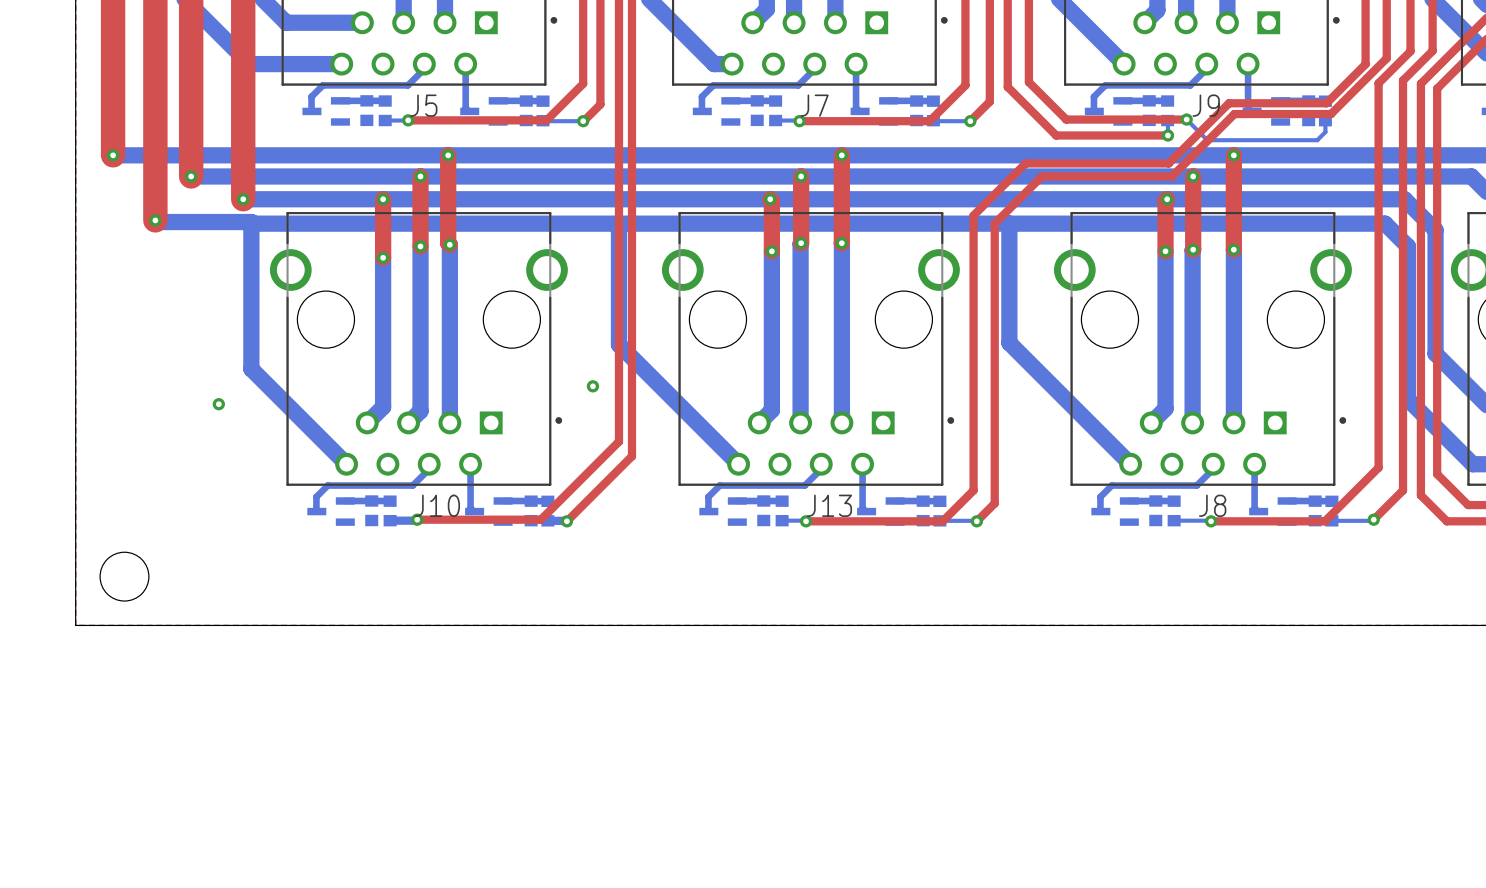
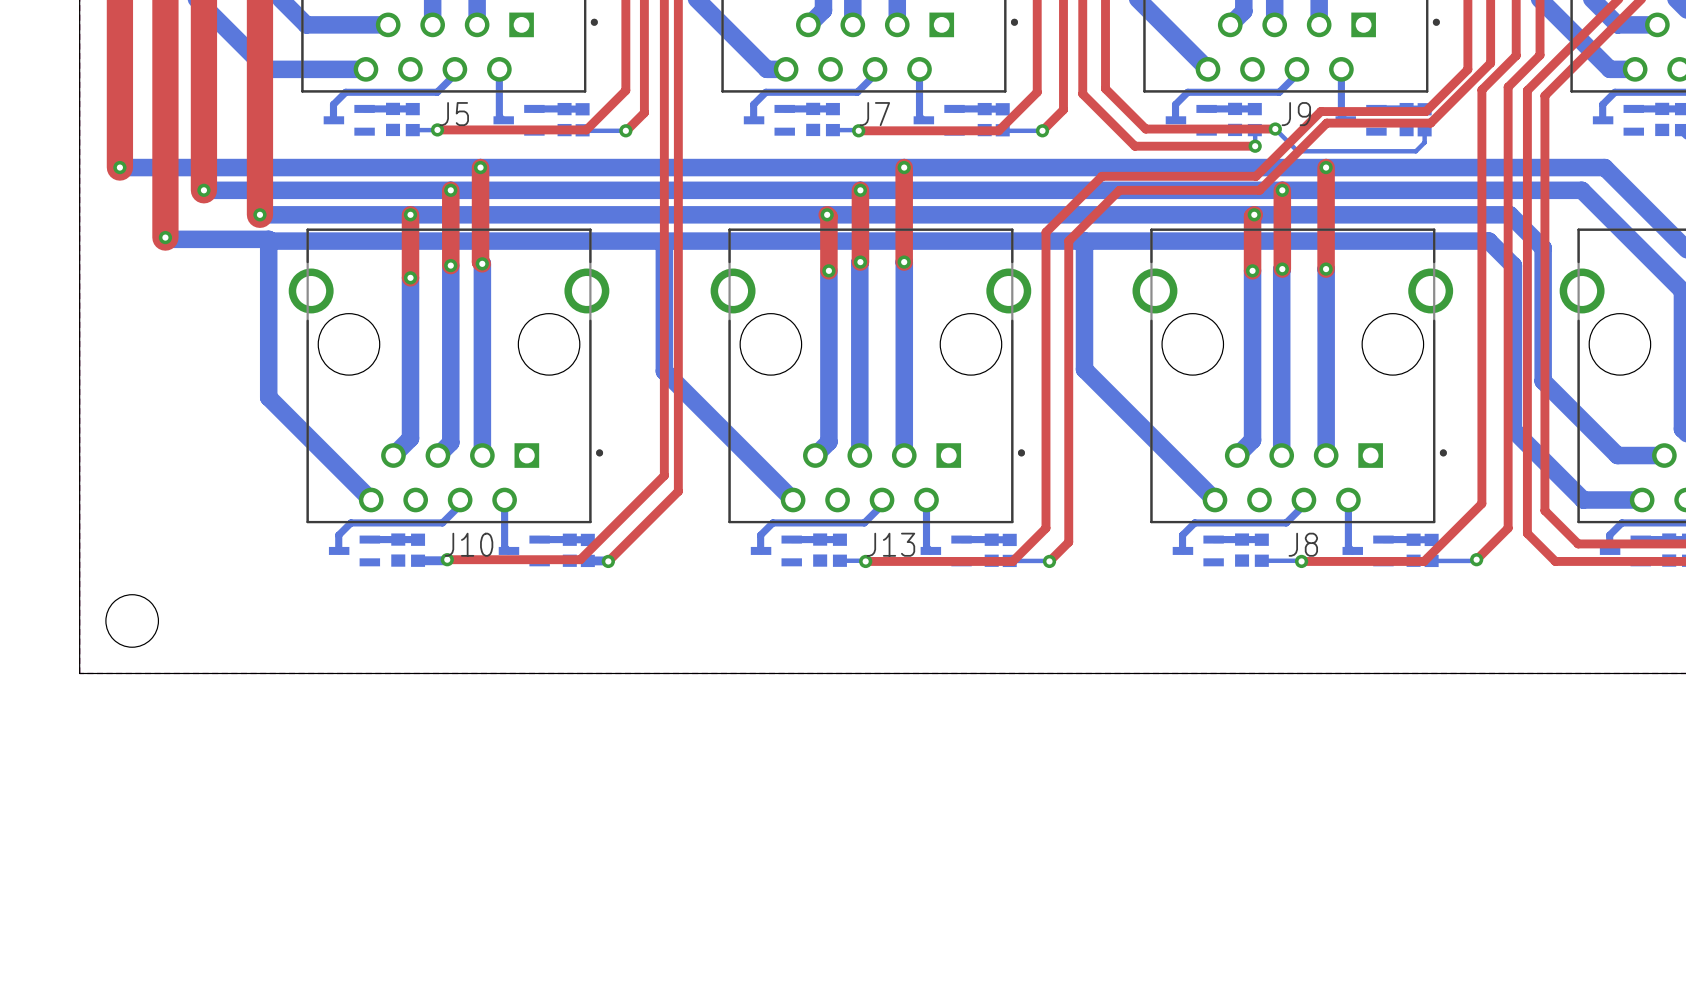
via: (592, 386) -> none
via: (218, 404) -> none

